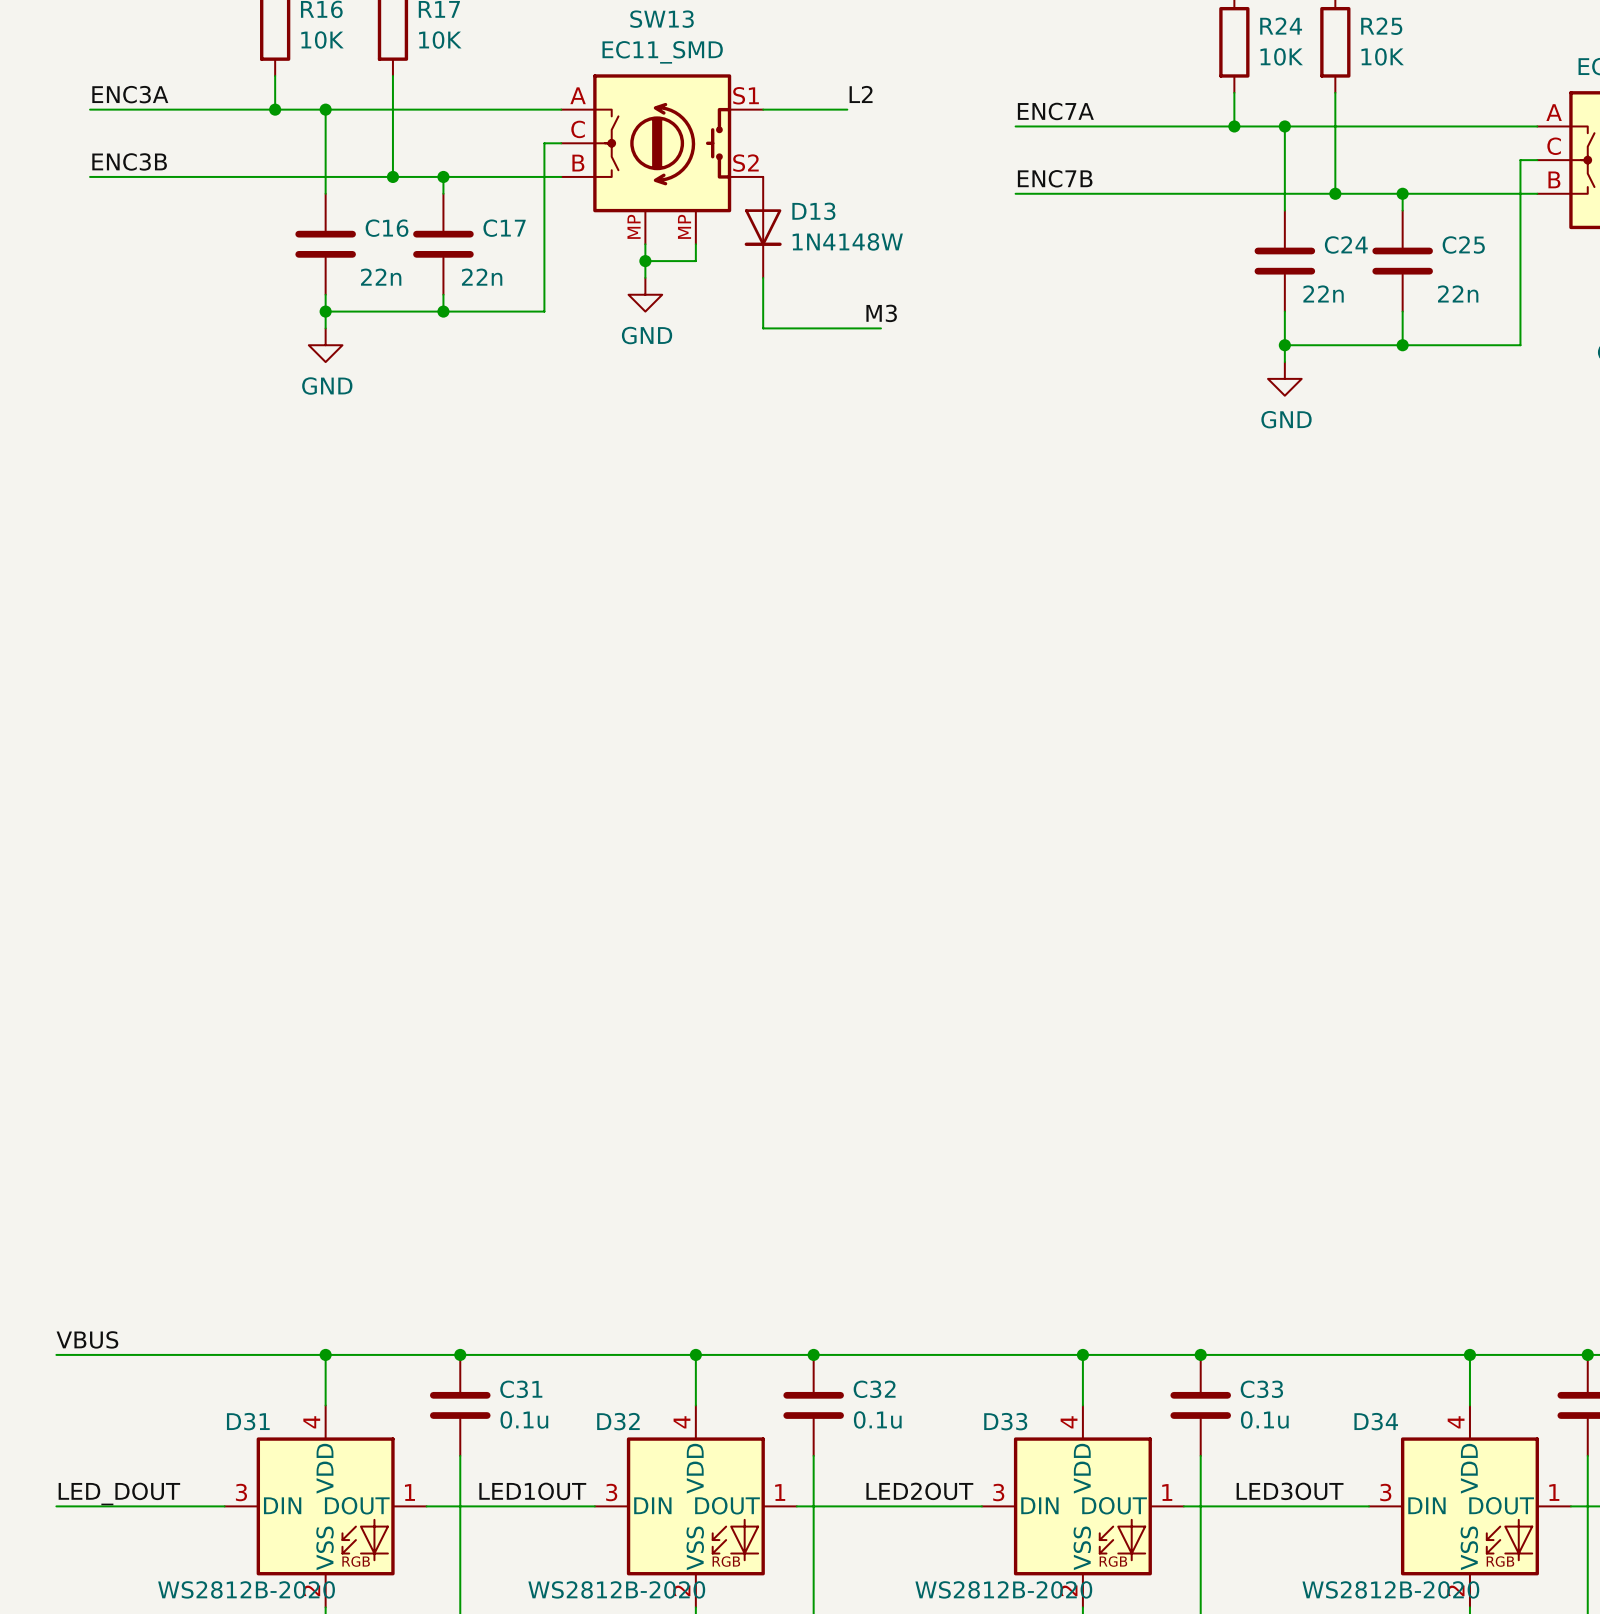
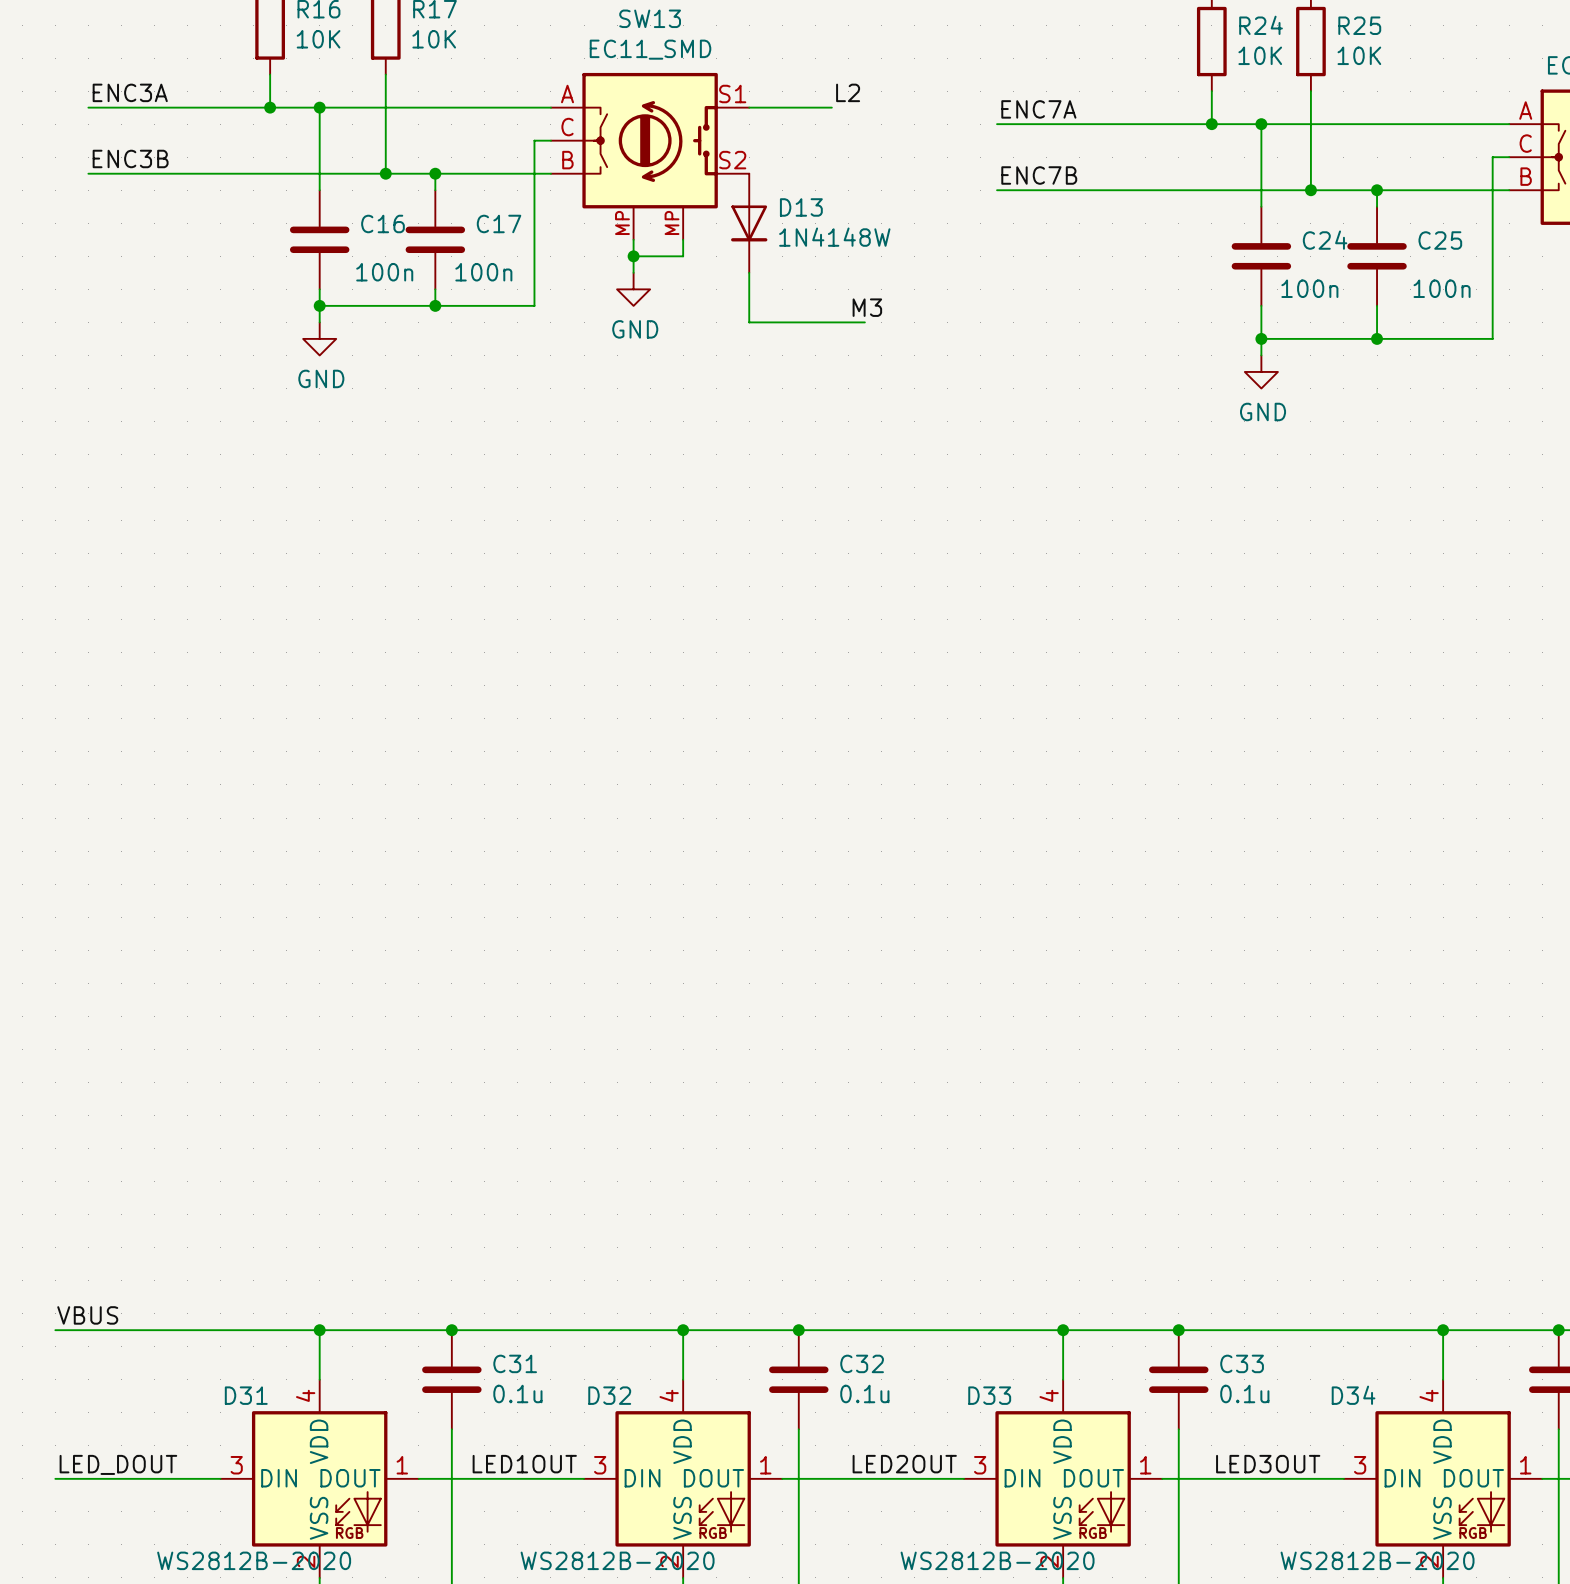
C16 value: 22n (381, 277) -> 100n (384, 272)
C17 value: 22n (482, 277) -> 100n (483, 272)
C24 value: 22n (1323, 293) -> 100n (1309, 288)
C25 value: 22n (1458, 293) -> 100n (1442, 288)

